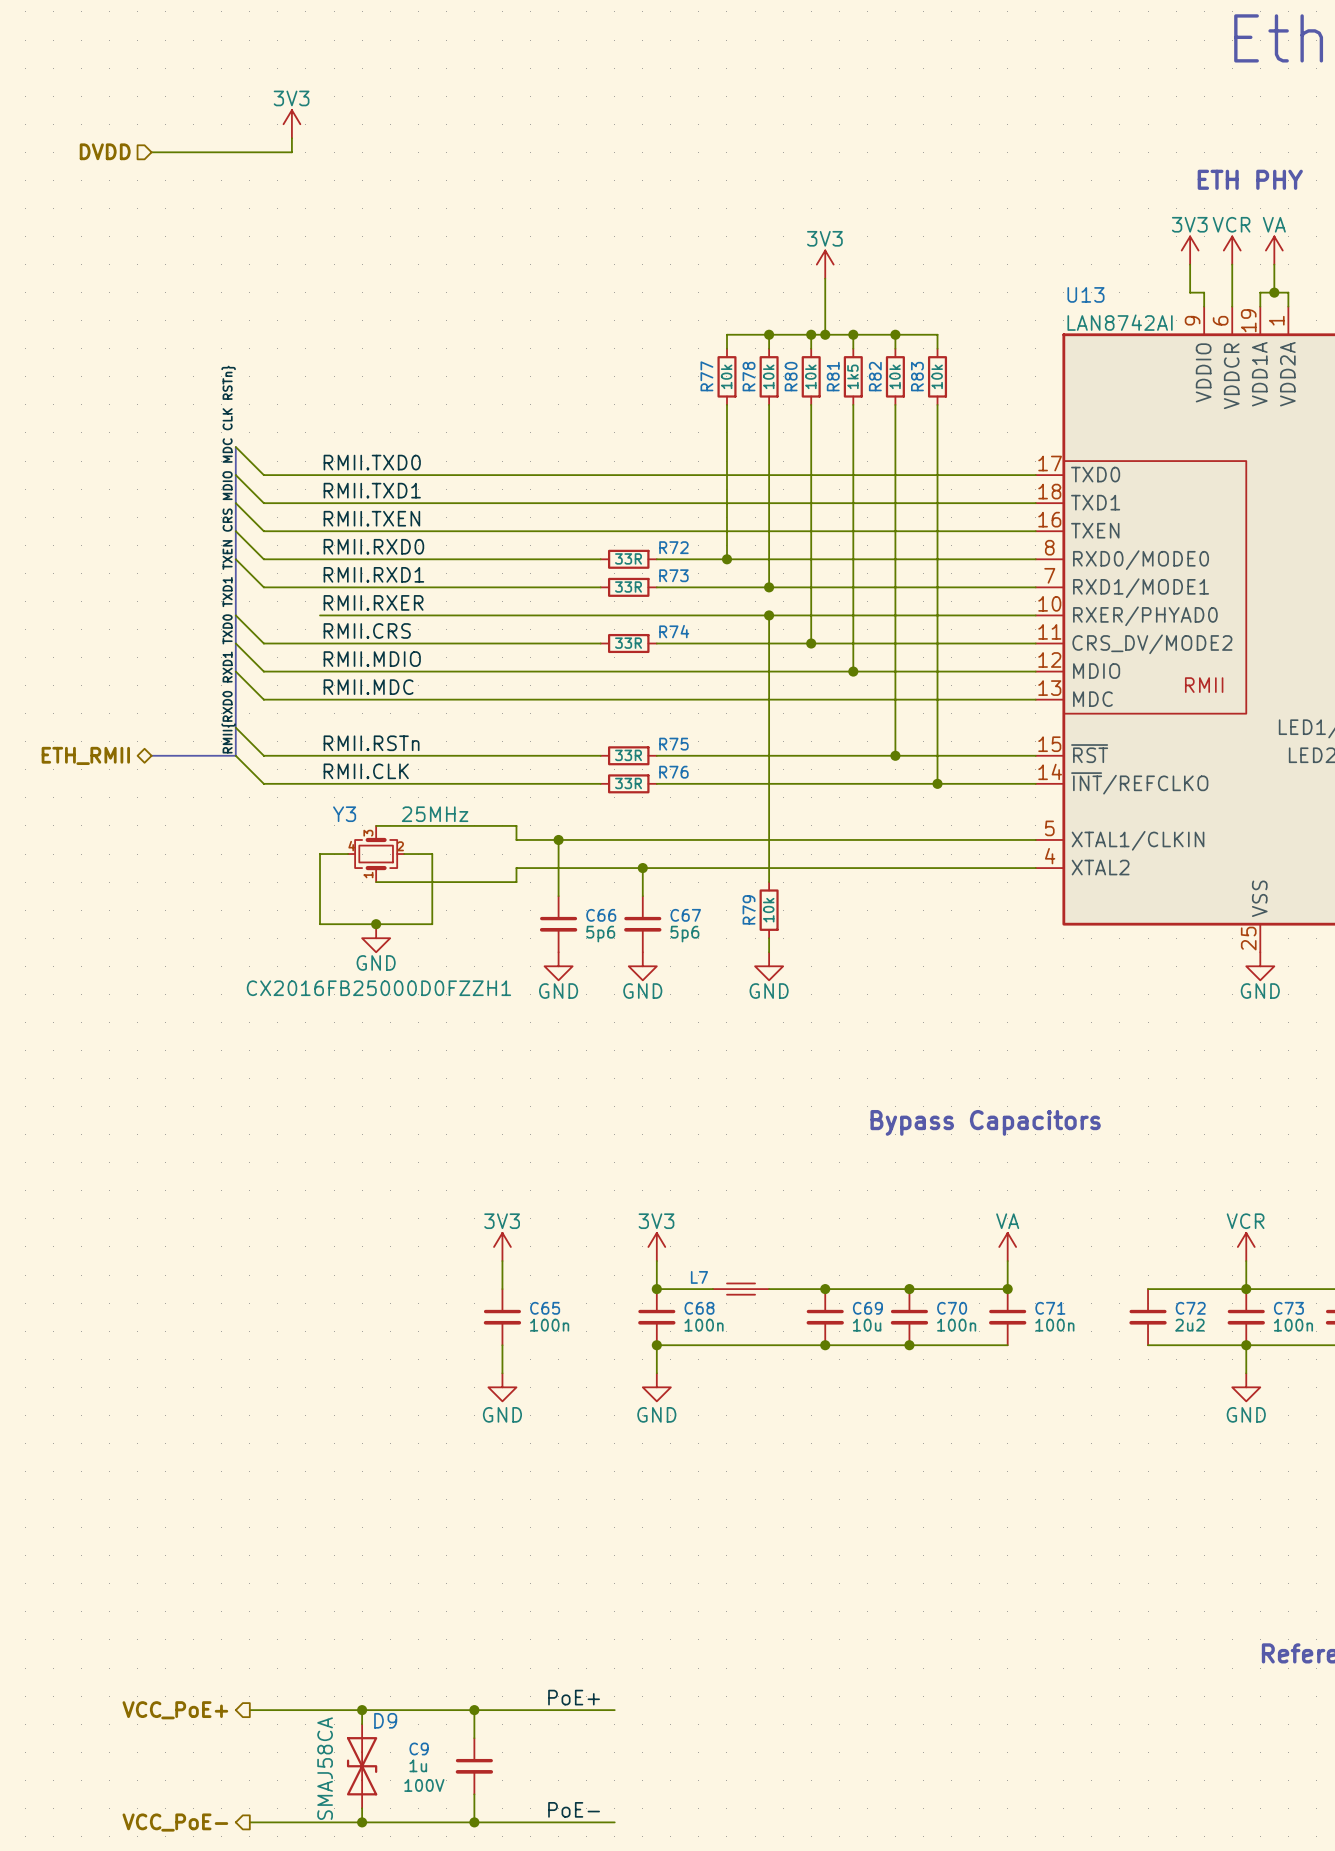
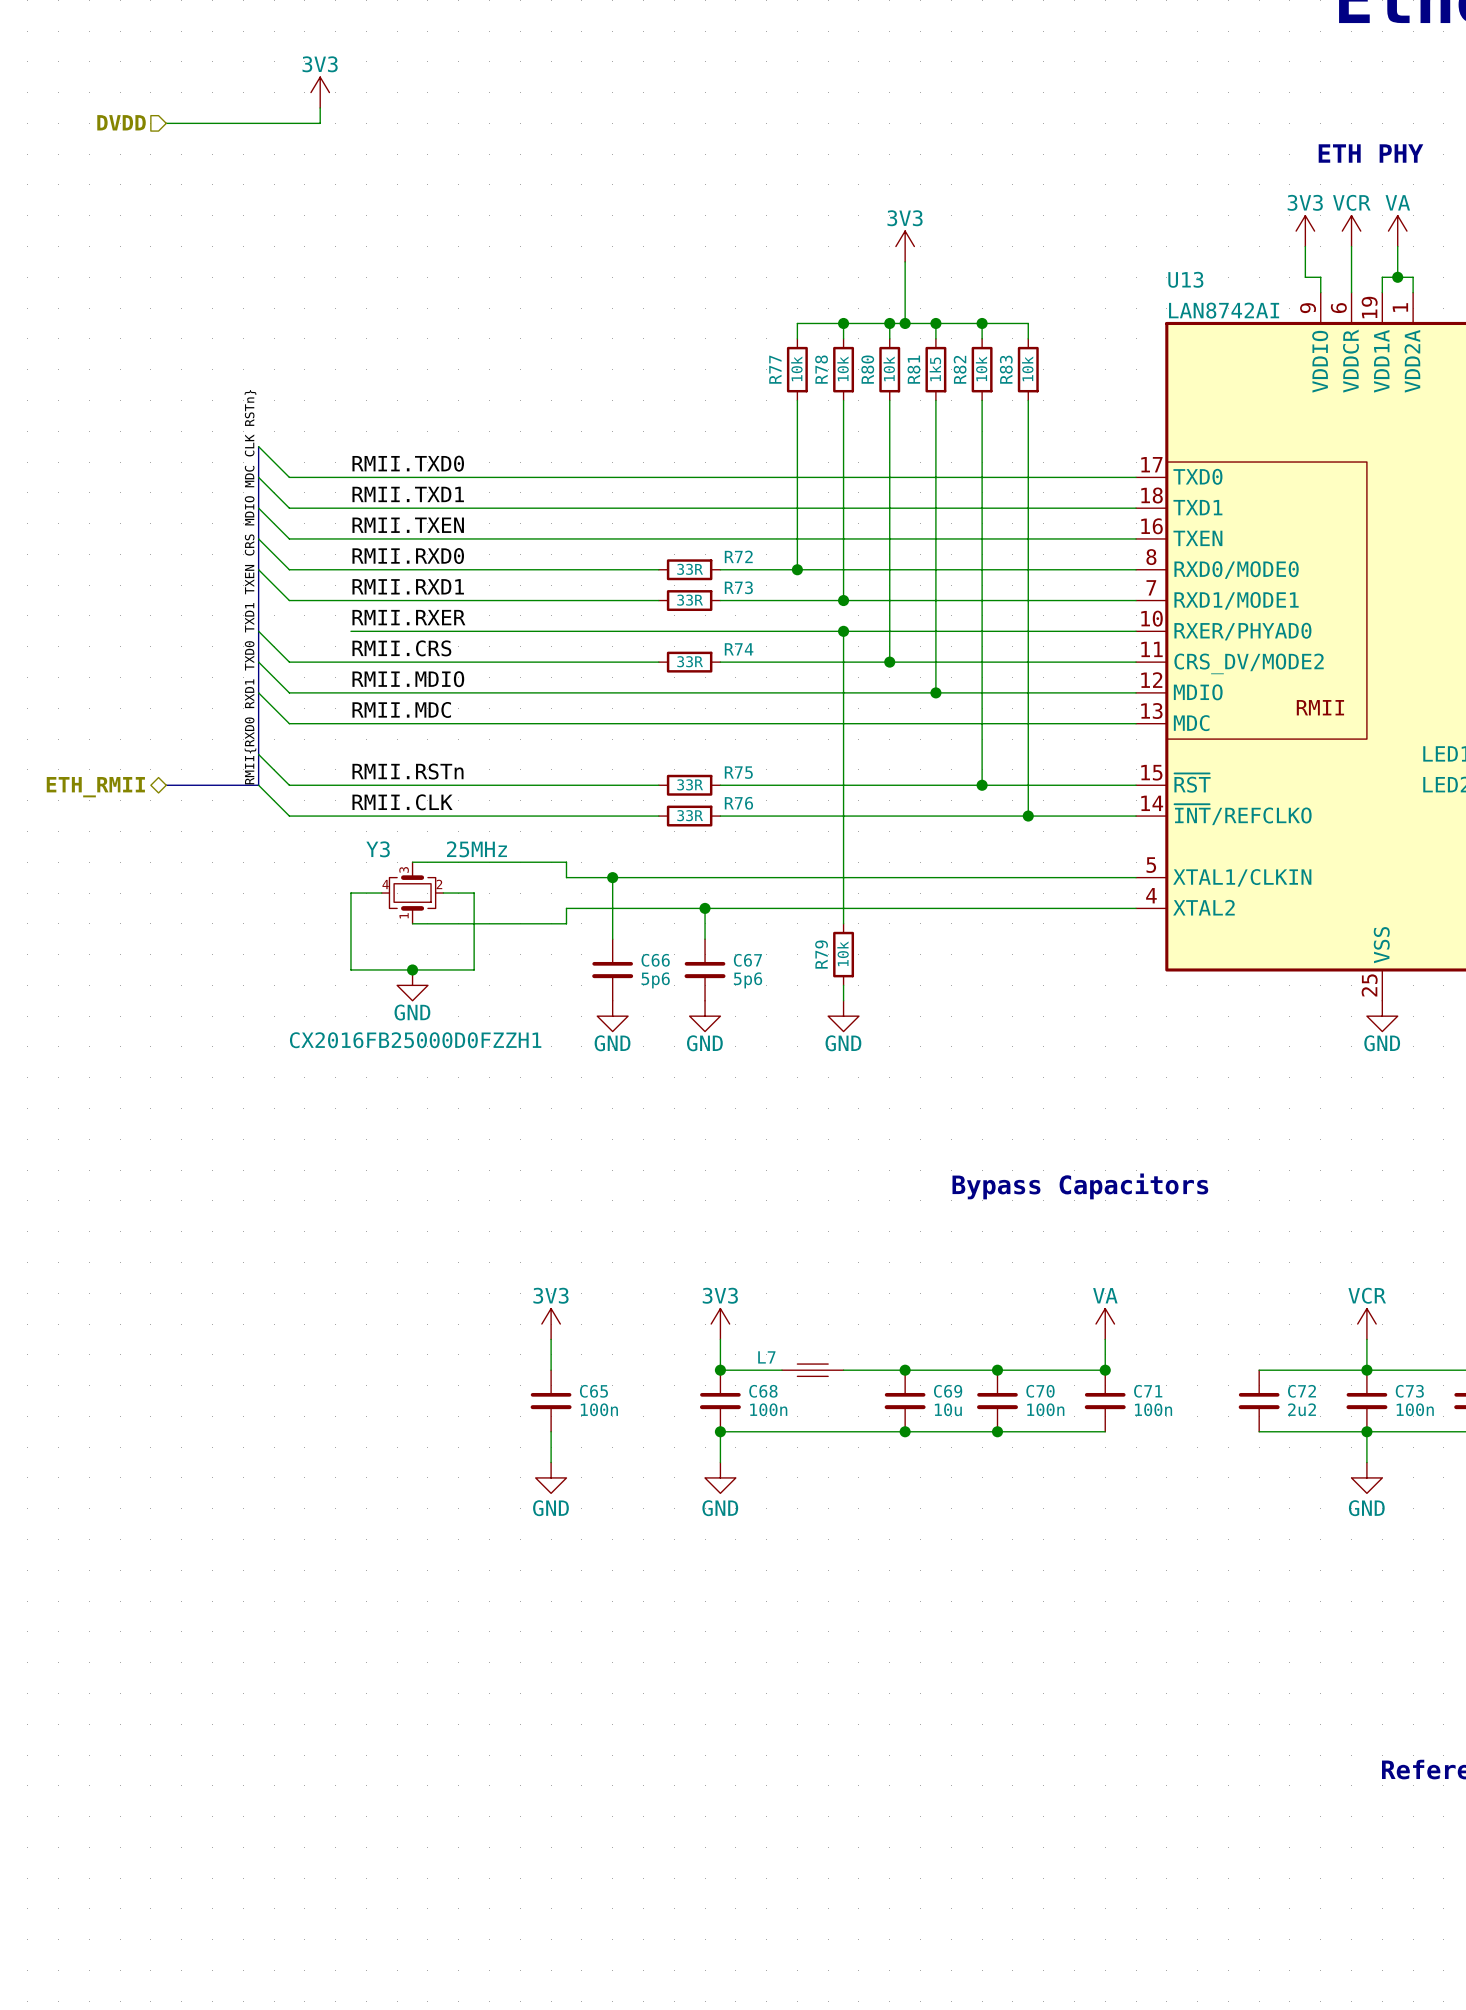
label: PoE+ (574, 1697) -> none
hierarchical label: VCC_PoE+ (175, 1710) -> none
wire: (249, 1710) (614, 1710) -> none
wire: (362, 1710) (362, 1724) -> none
junction: (362, 1710) -> none
wire: (474, 1710) (474, 1738) -> none
junction: (474, 1710) -> none
D9: SMAJ58CA (362, 1766) -> none
C9: 1u (474, 1766) -> none
wire: (474, 1794) (474, 1822) -> none
wire: (362, 1808) (362, 1822) -> none
label: PoE- (574, 1809) -> none
hierarchical label: VCC_PoE- (175, 1822) -> none
wire: (249, 1822) (614, 1822) -> none
junction: (362, 1822) -> none
junction: (474, 1822) -> none

